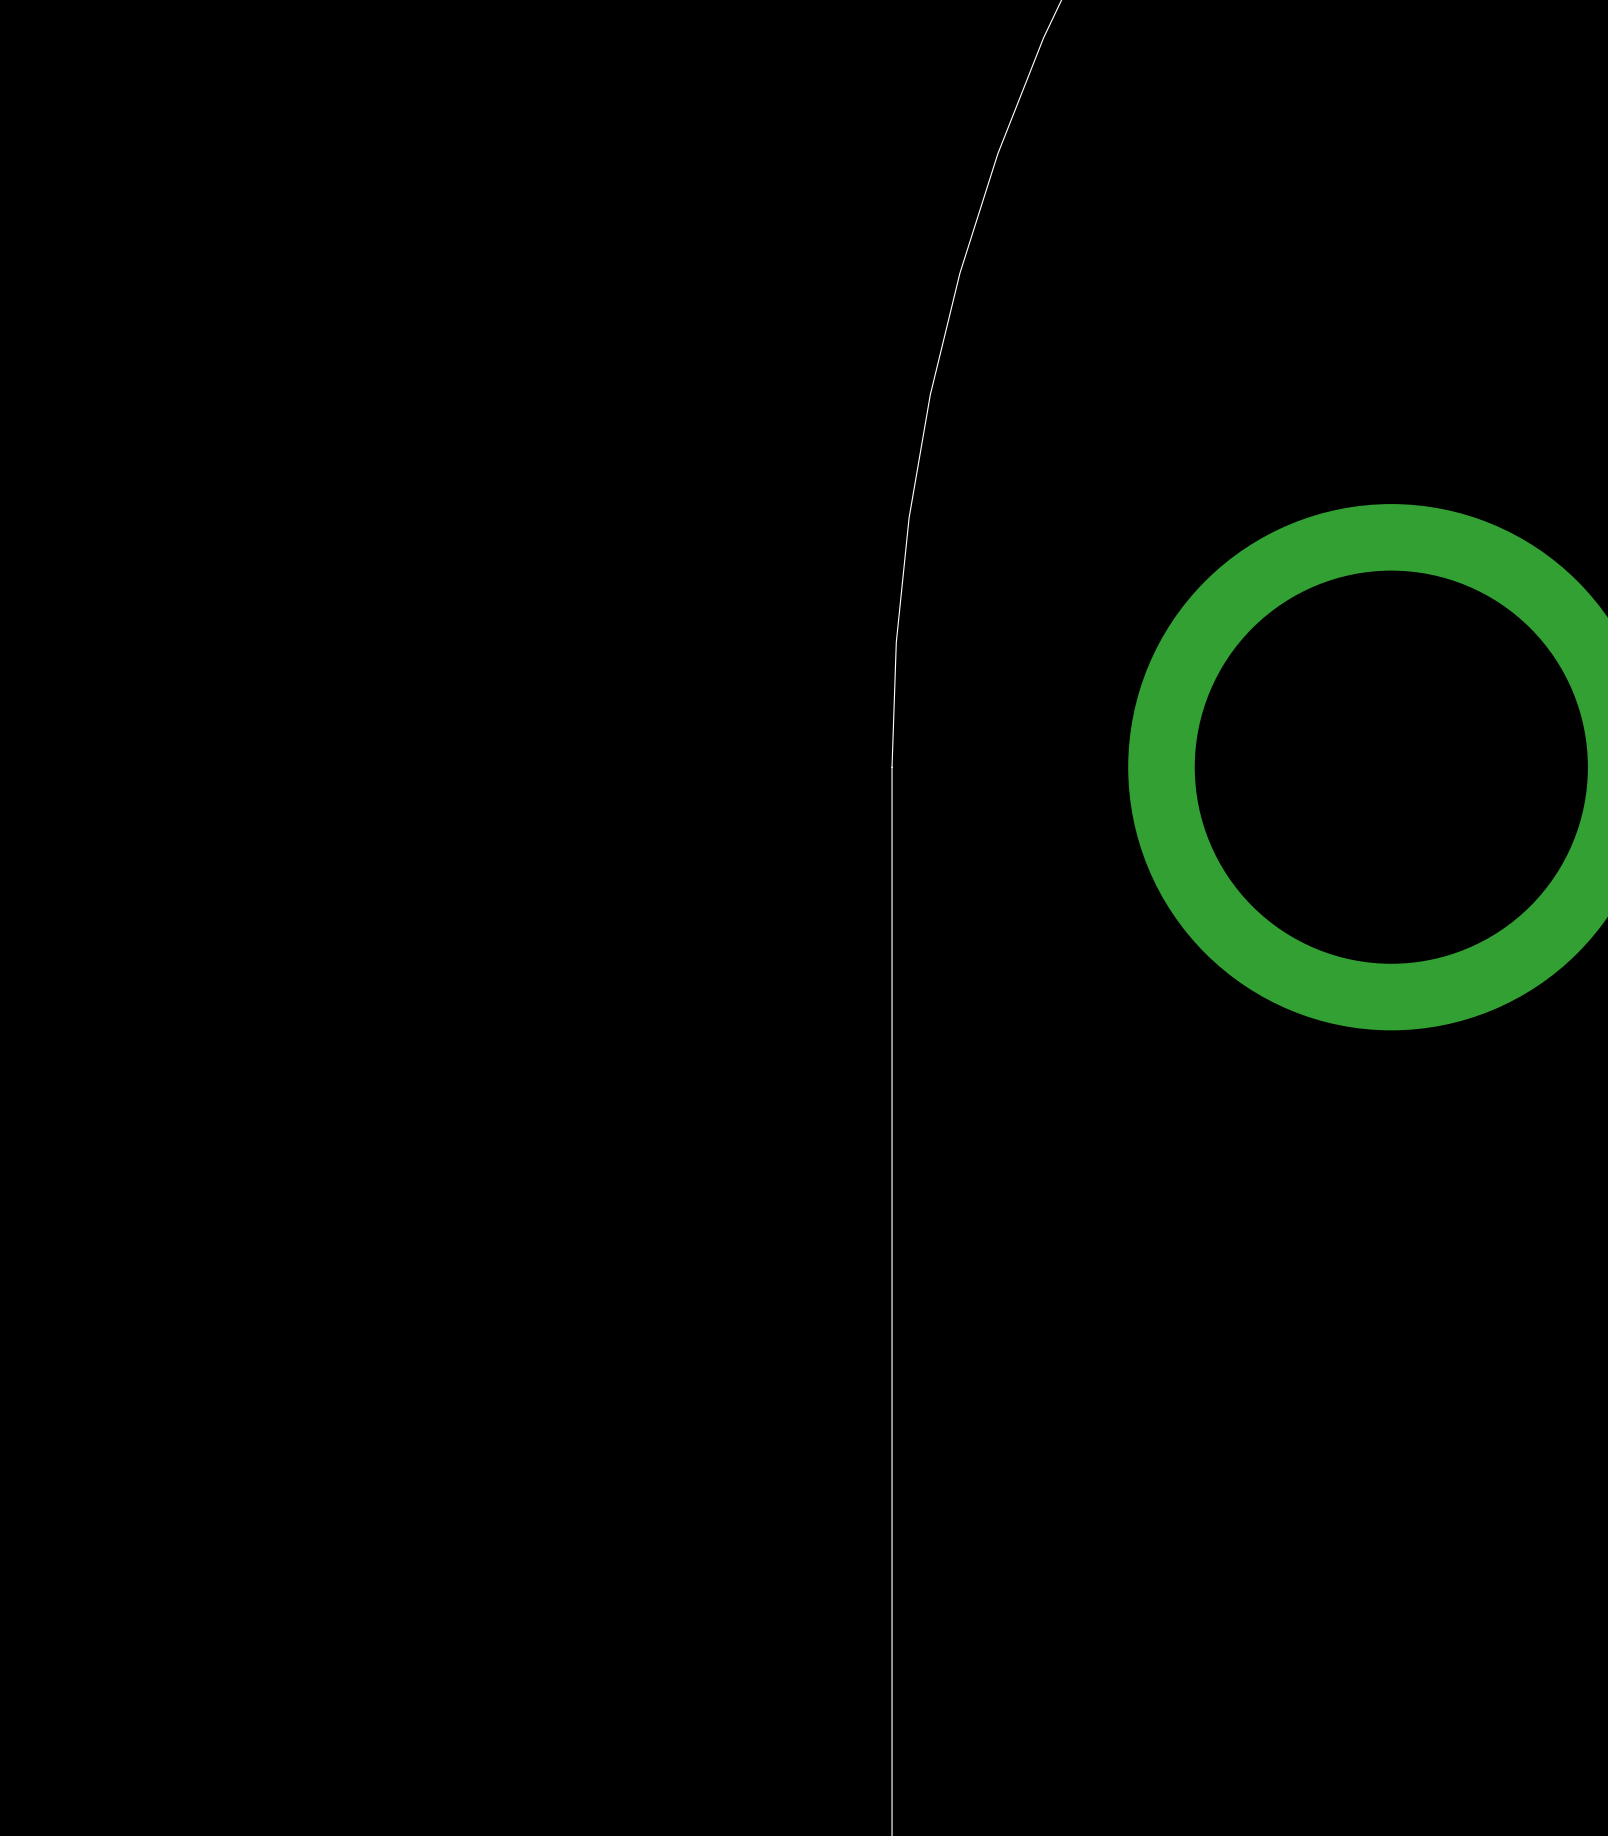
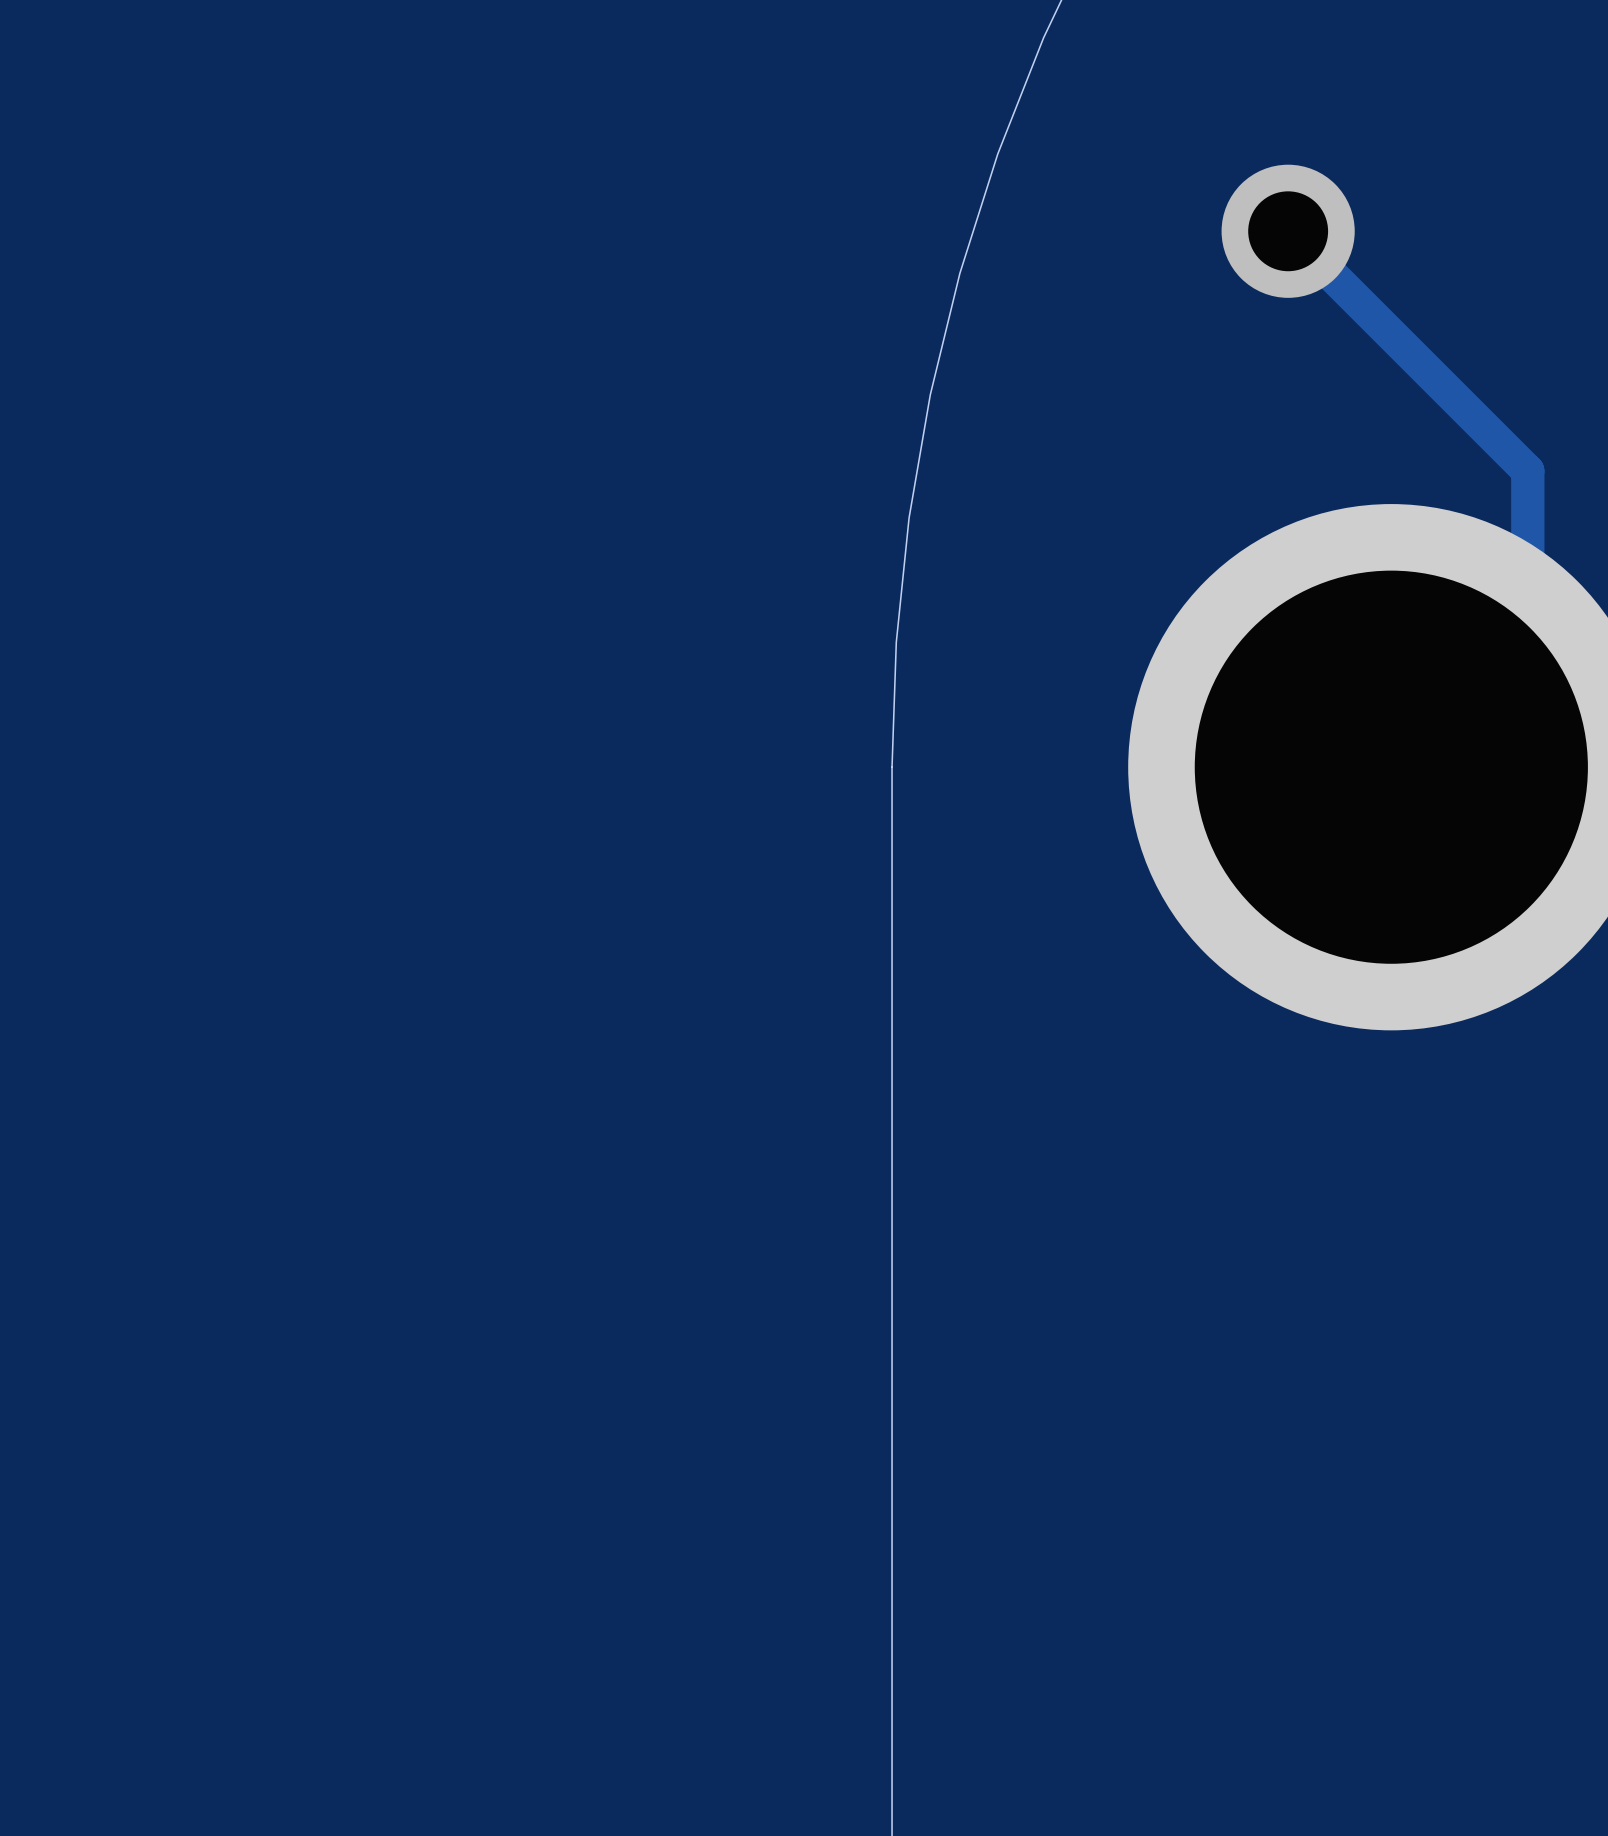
track: none -> (1288, 231) (1527, 470) (1527, 740)
via: none -> (1288, 231)

